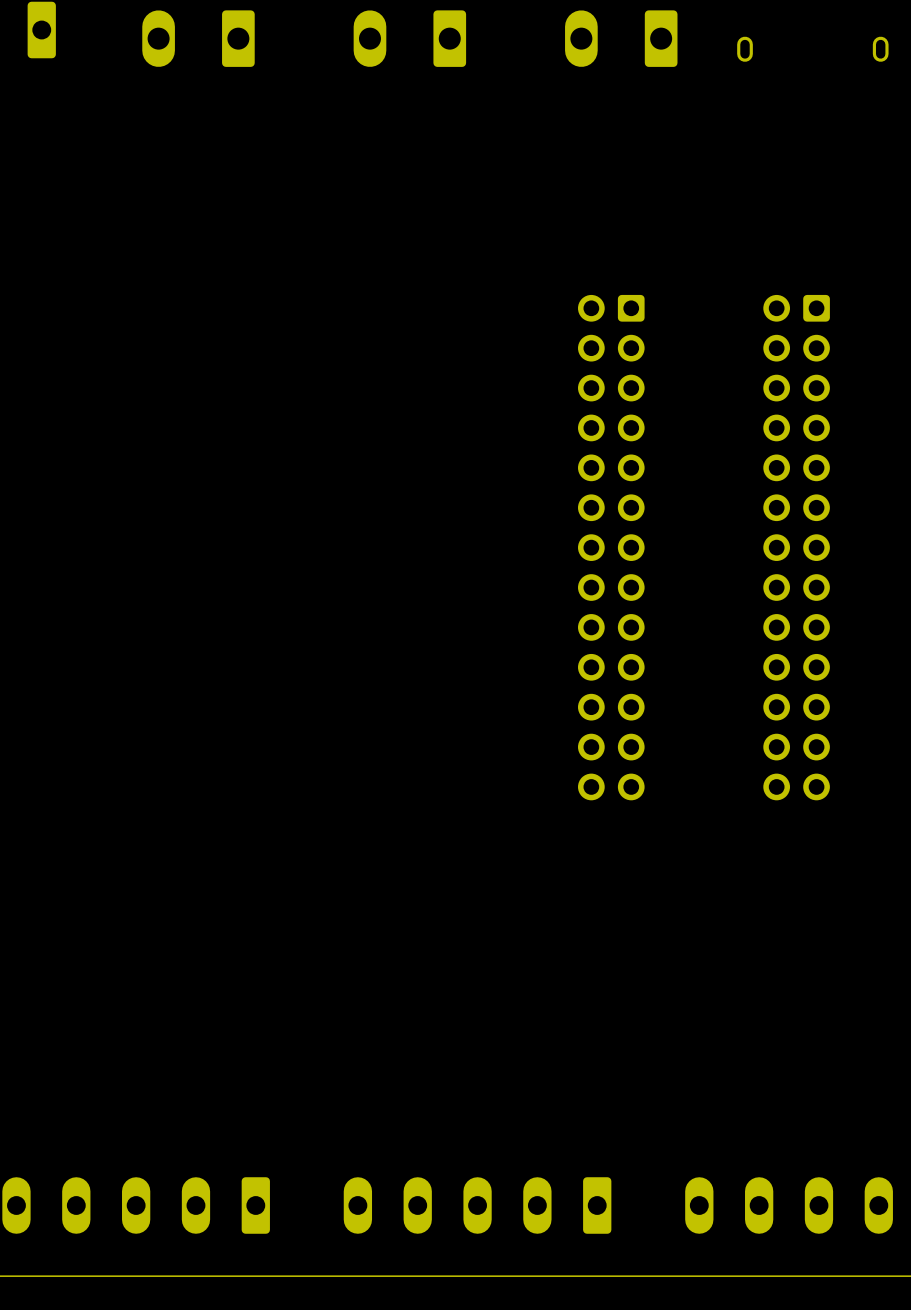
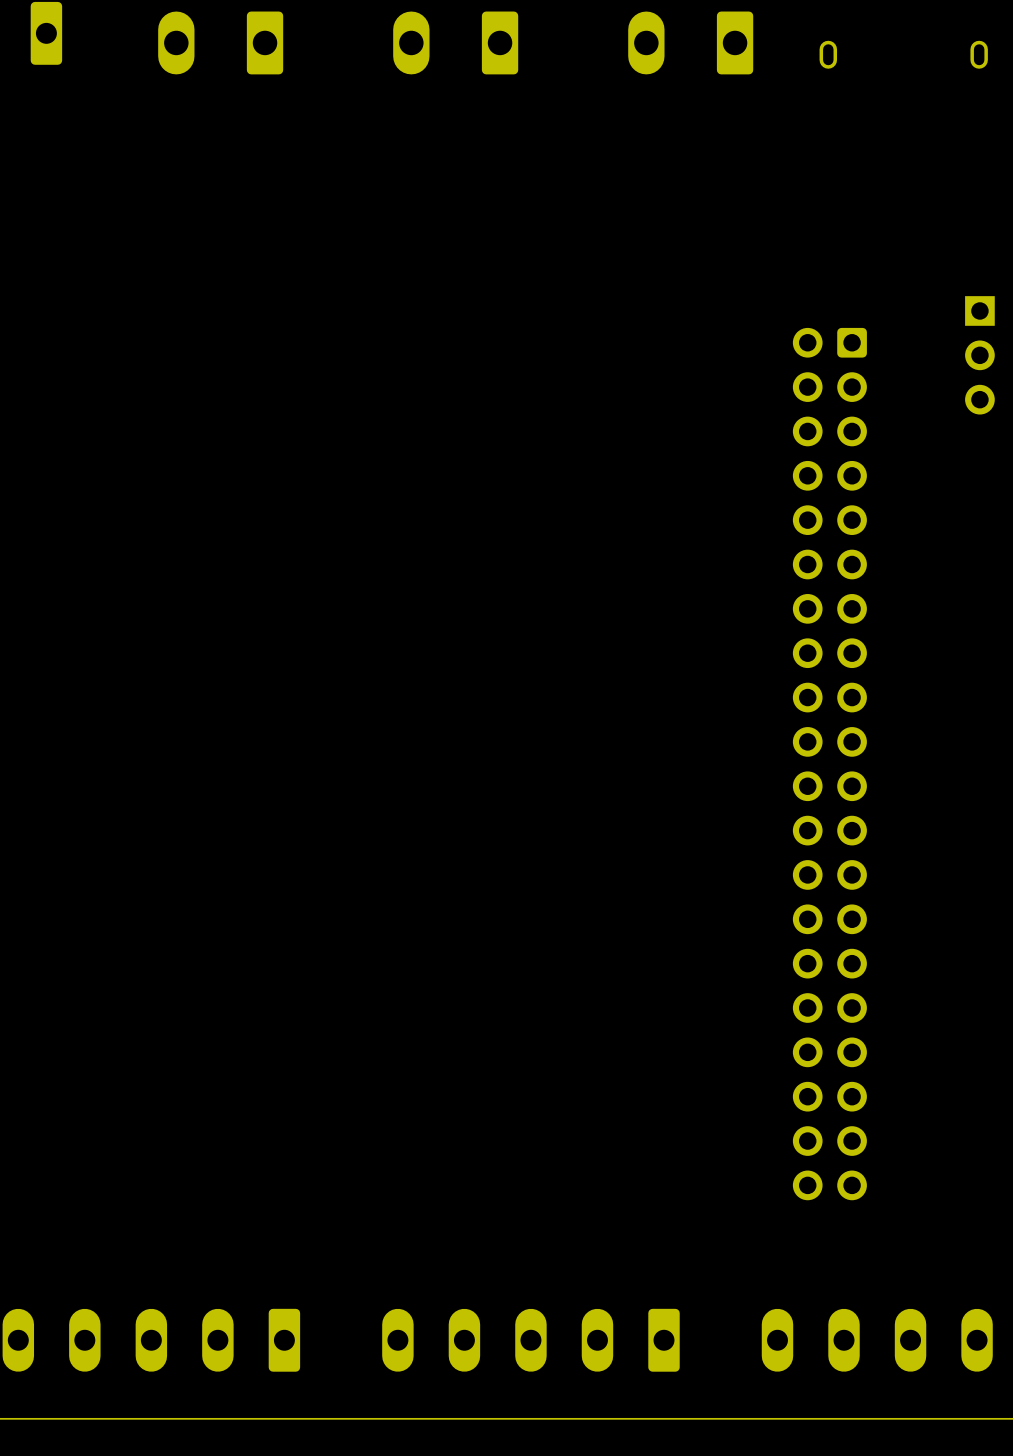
part: none -> (979, 355)
part: (611, 547) -> none
part: (796, 547) -> none
part: none -> (829, 764)

